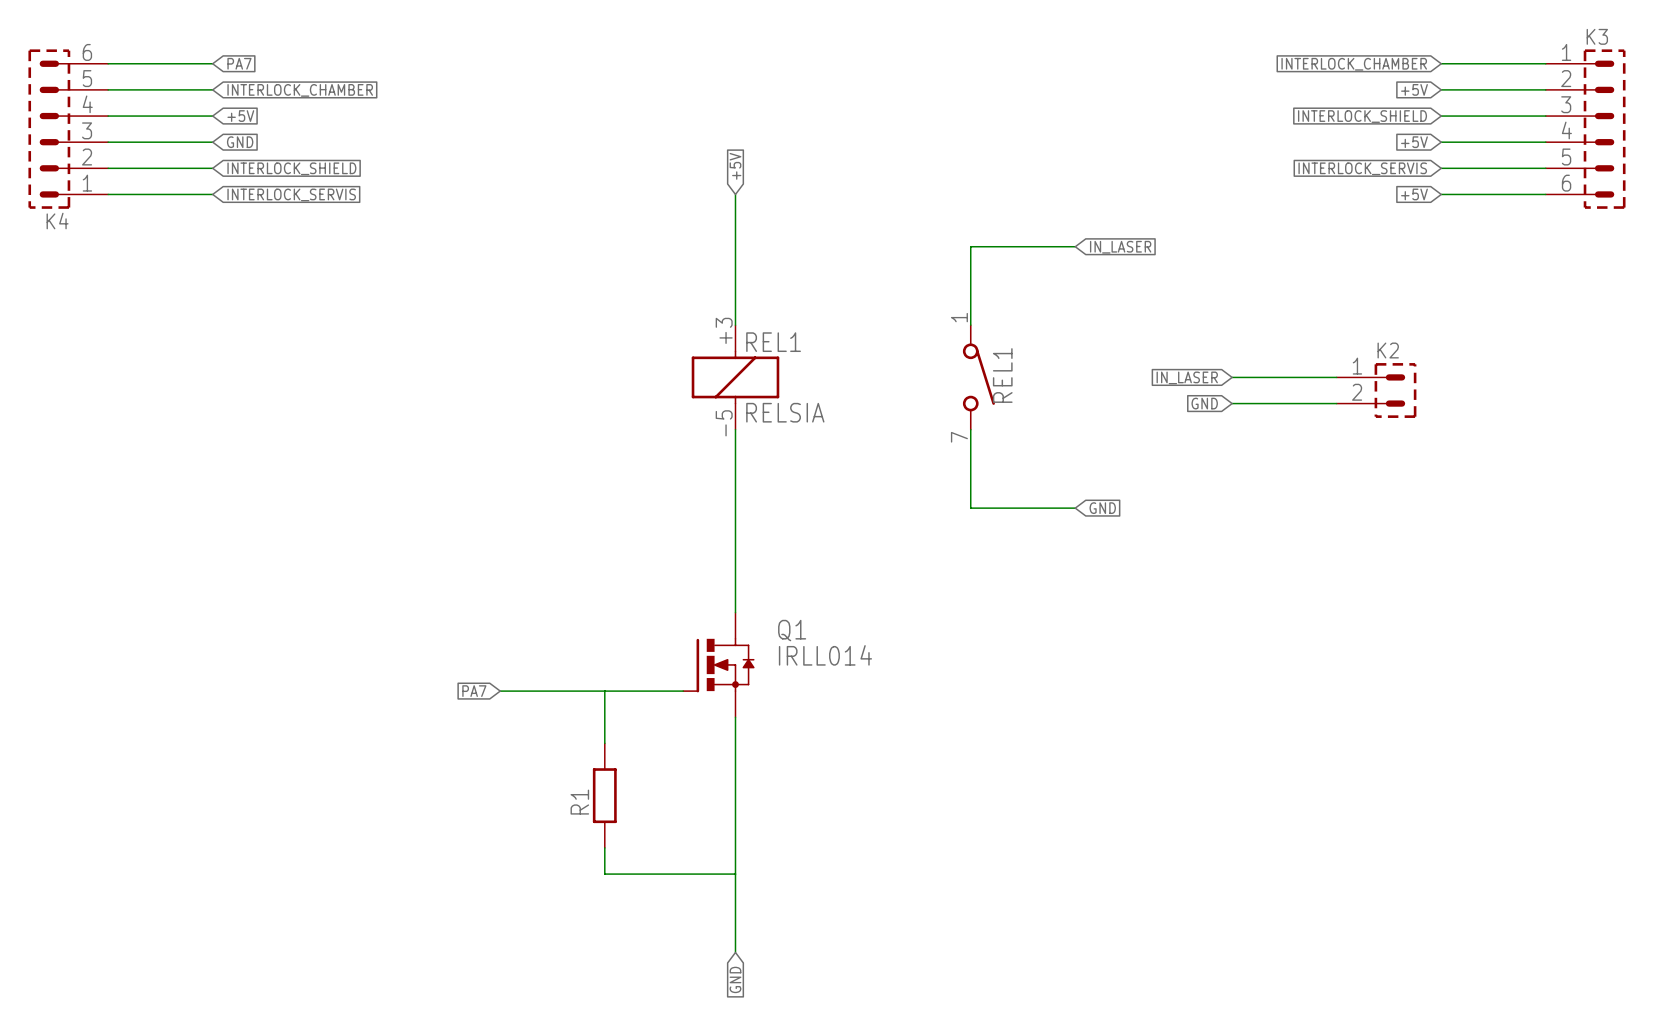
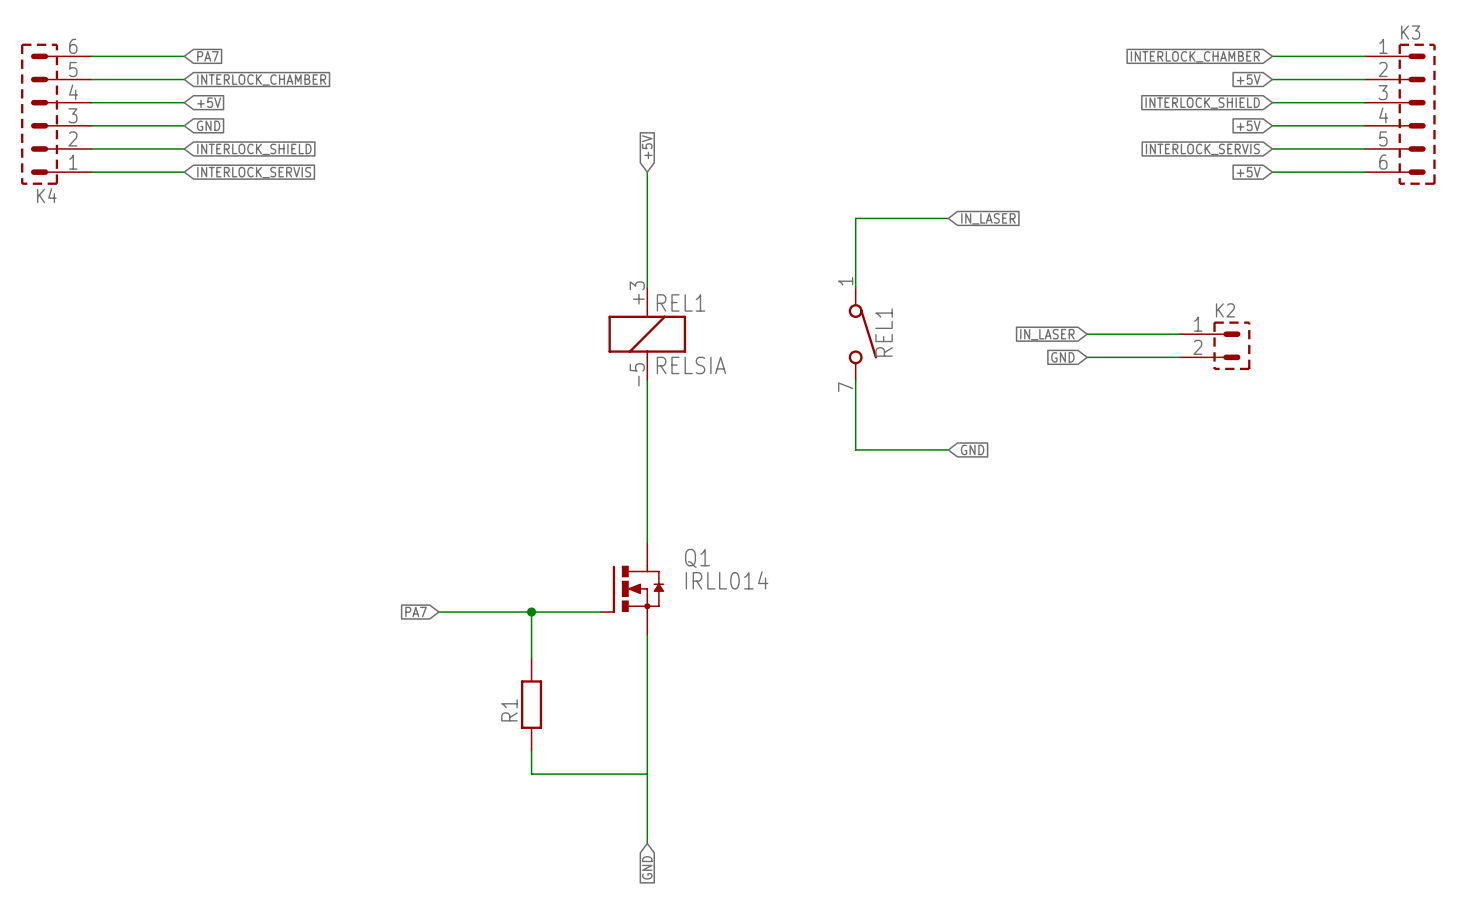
junction: none -> (531, 612)

